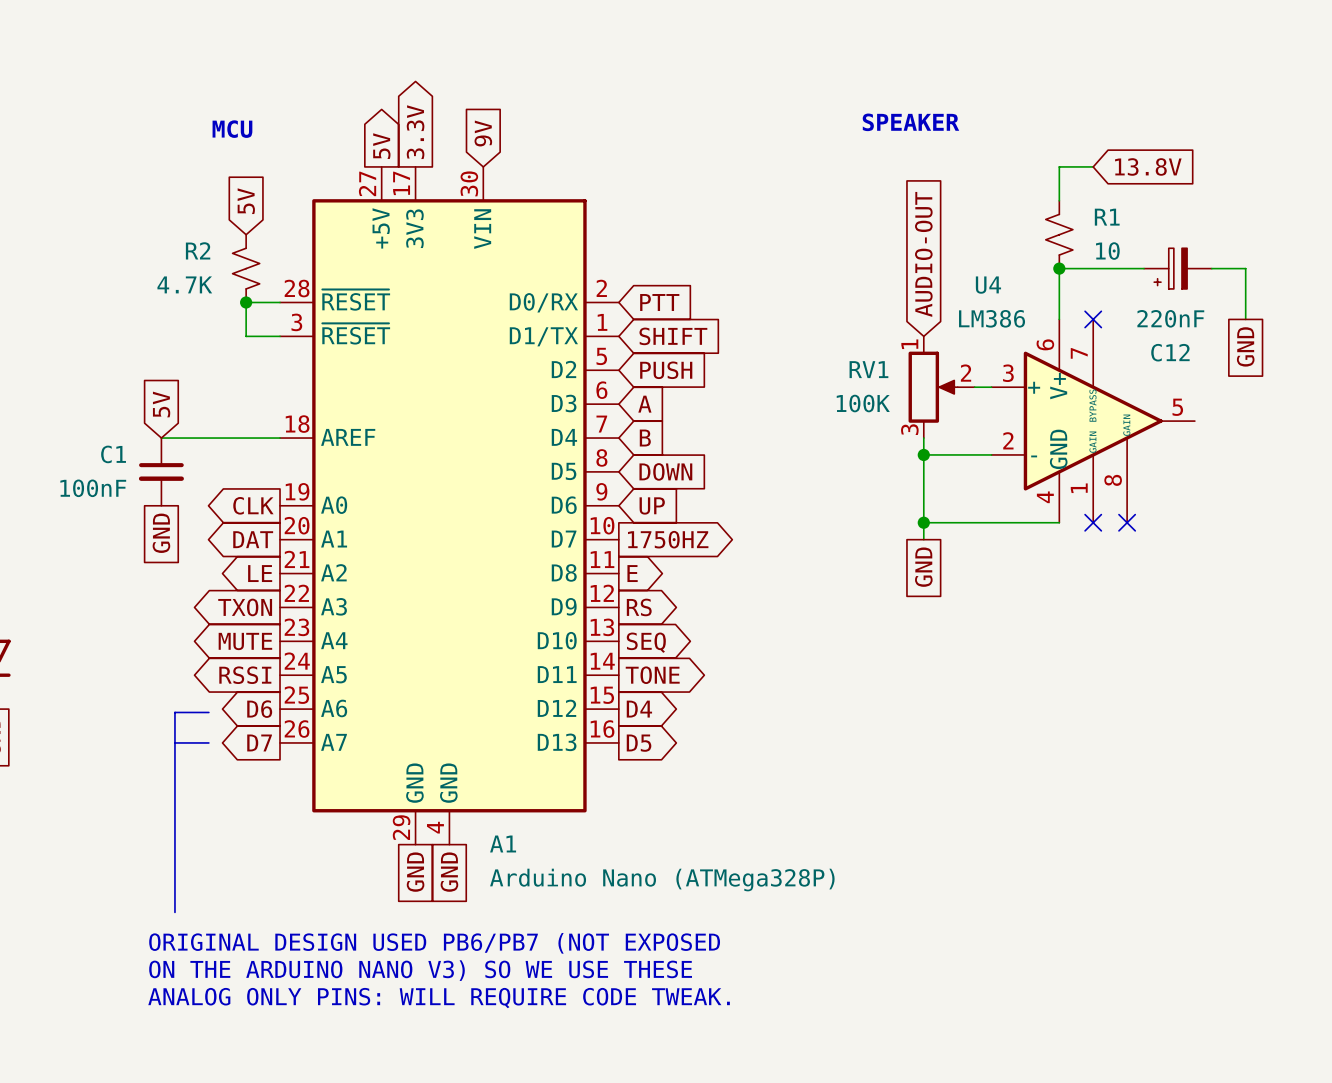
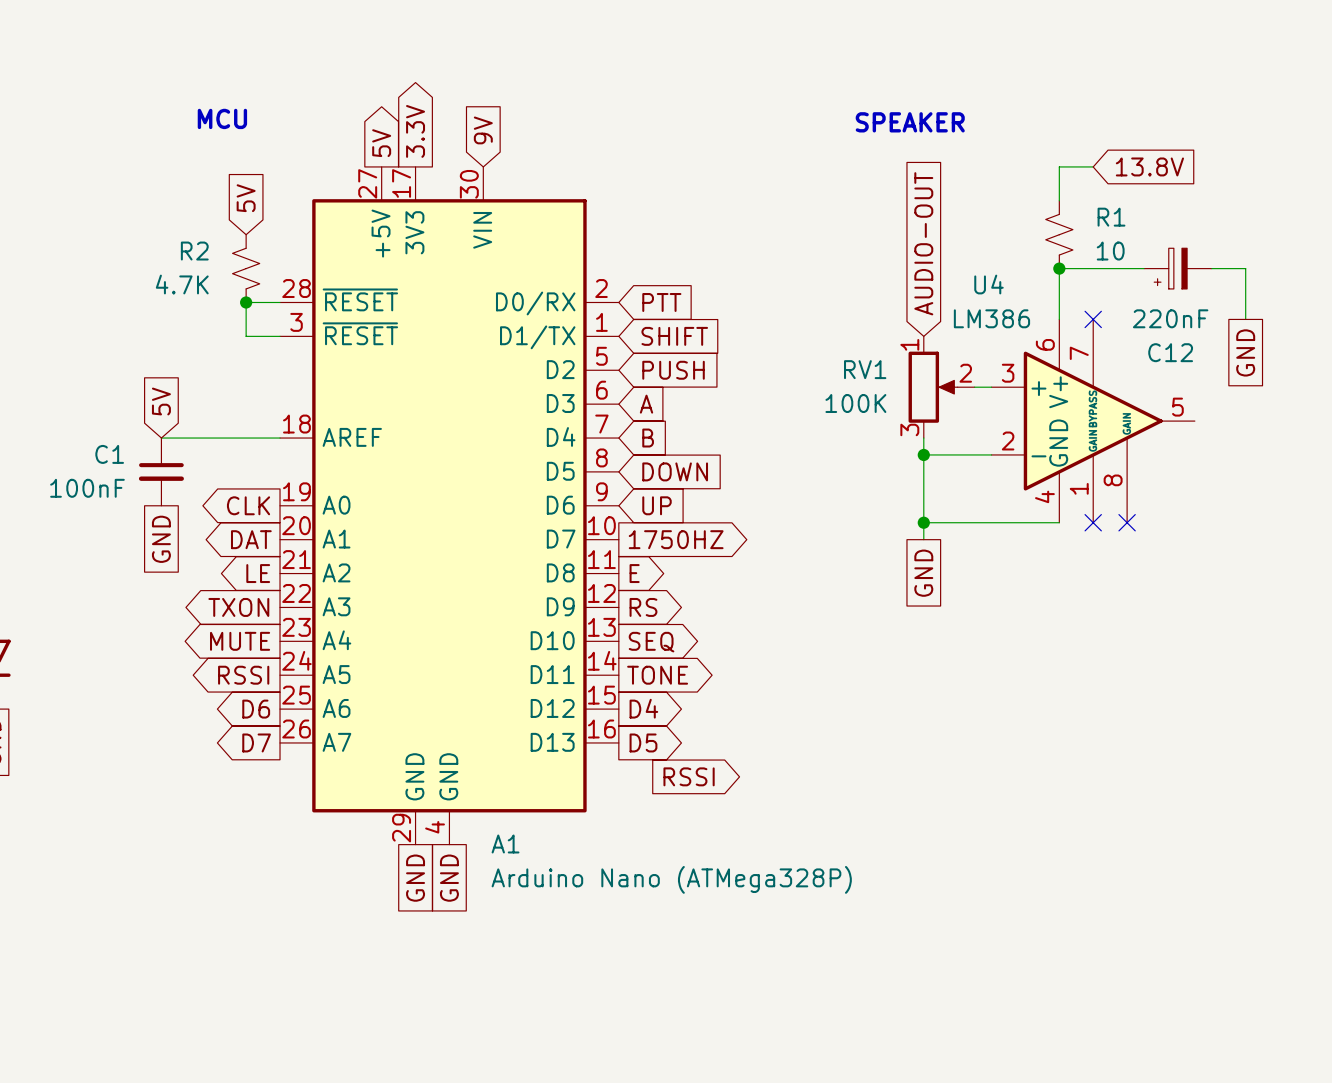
text position: MCU (232, 129) -> MCU (222, 118)
line: (208, 712) (174, 712) (174, 912) -> none
line: (174, 742) (208, 742) -> none
global label: none -> RSSI (689, 776)
text: ORIGINAL DESIGN USED PB6/PB7 (NOT EXPOSED (434, 943) -> none
text: ON THE ARDUINO NANO V3) SO WE USE THESE (420, 970) -> none
text: ANALOG ONLY PINS: WILL REQUIRE CODE TWEAK. (439, 998) -> none

